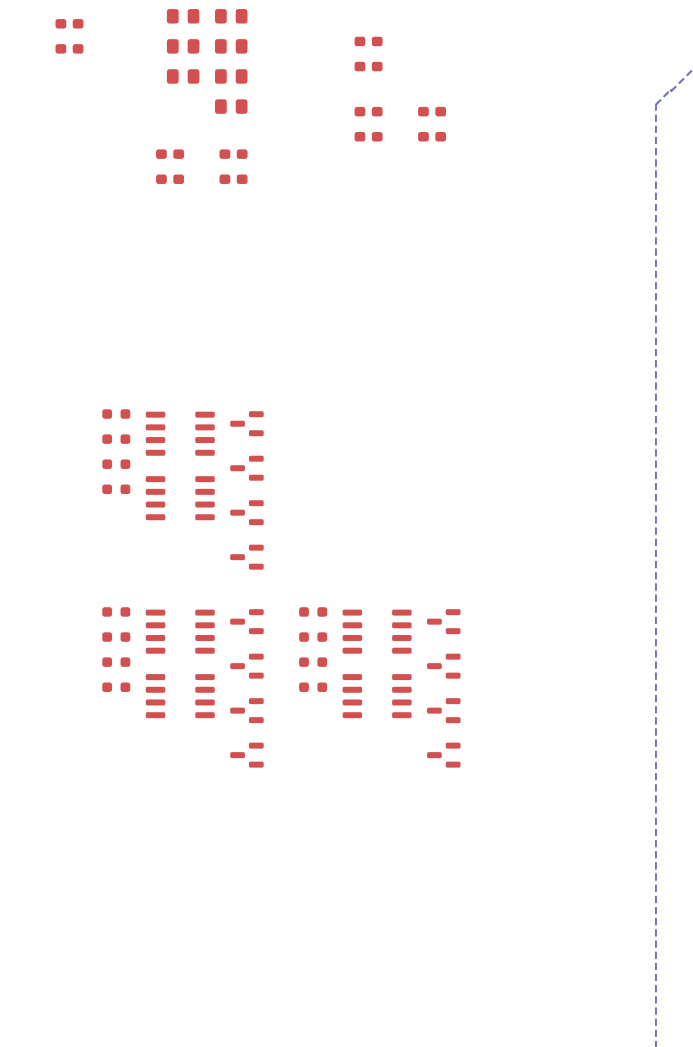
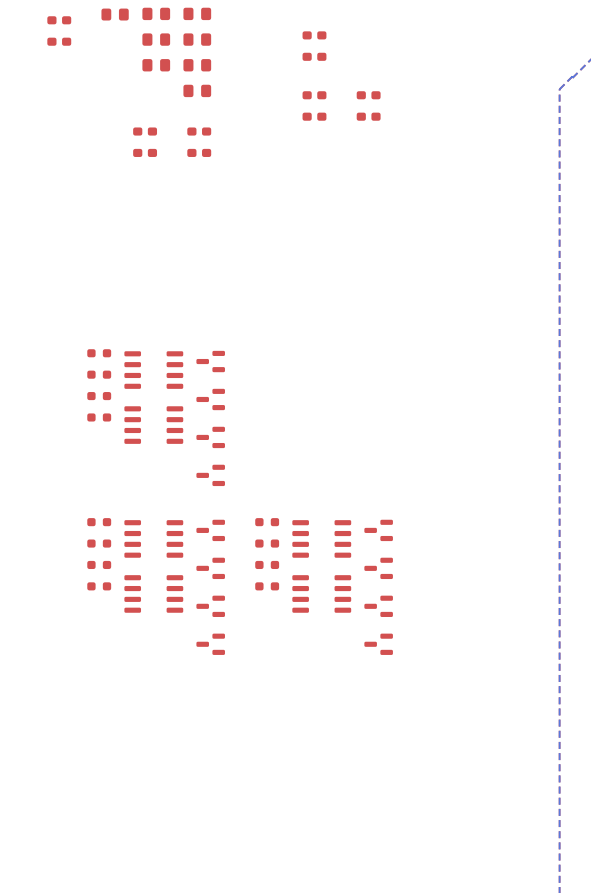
part: none -> (115, 14)

